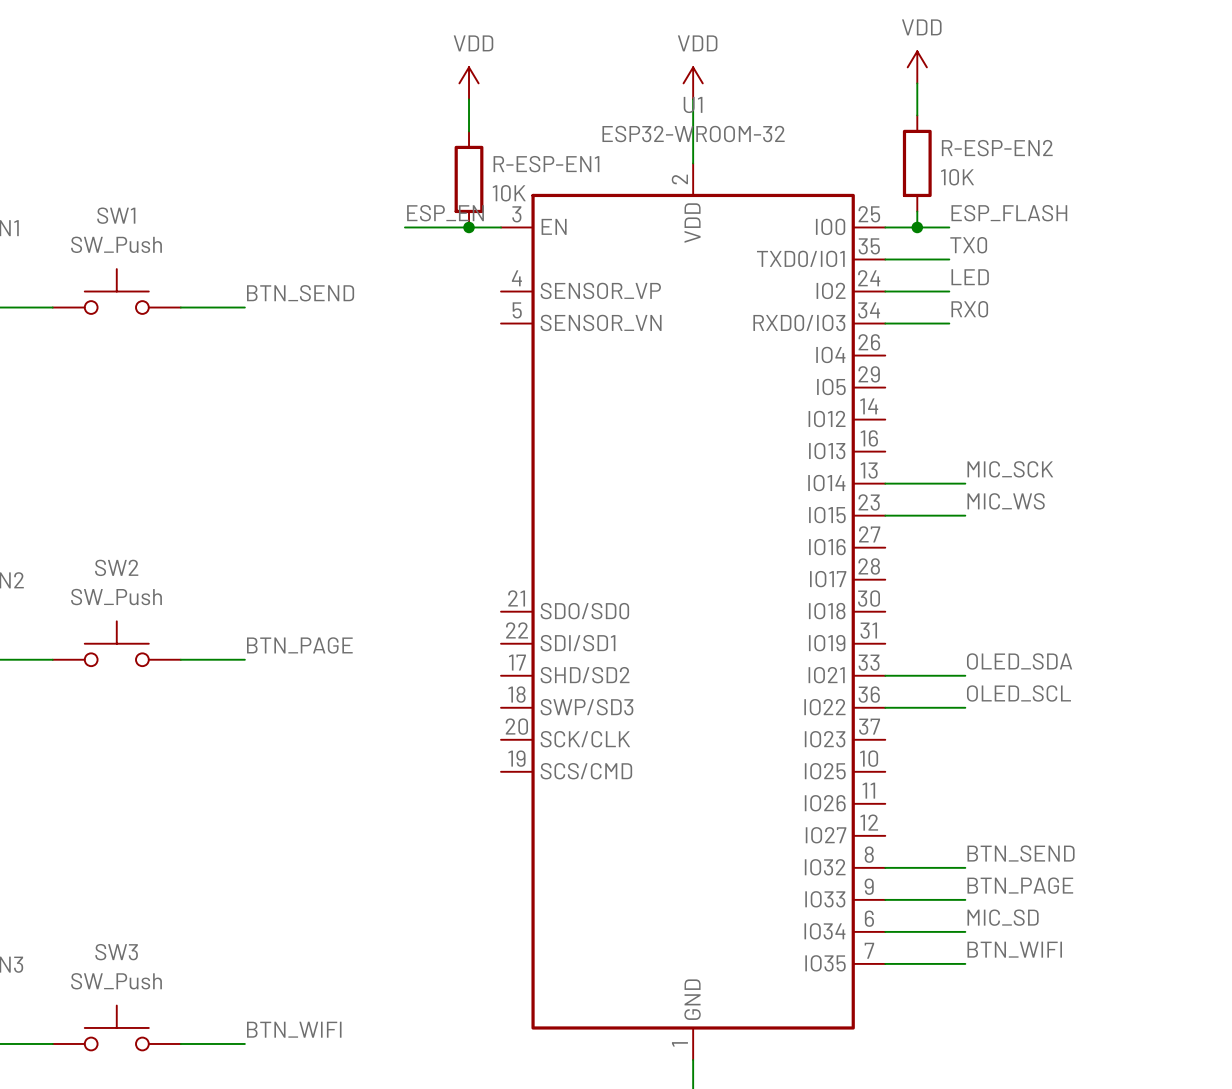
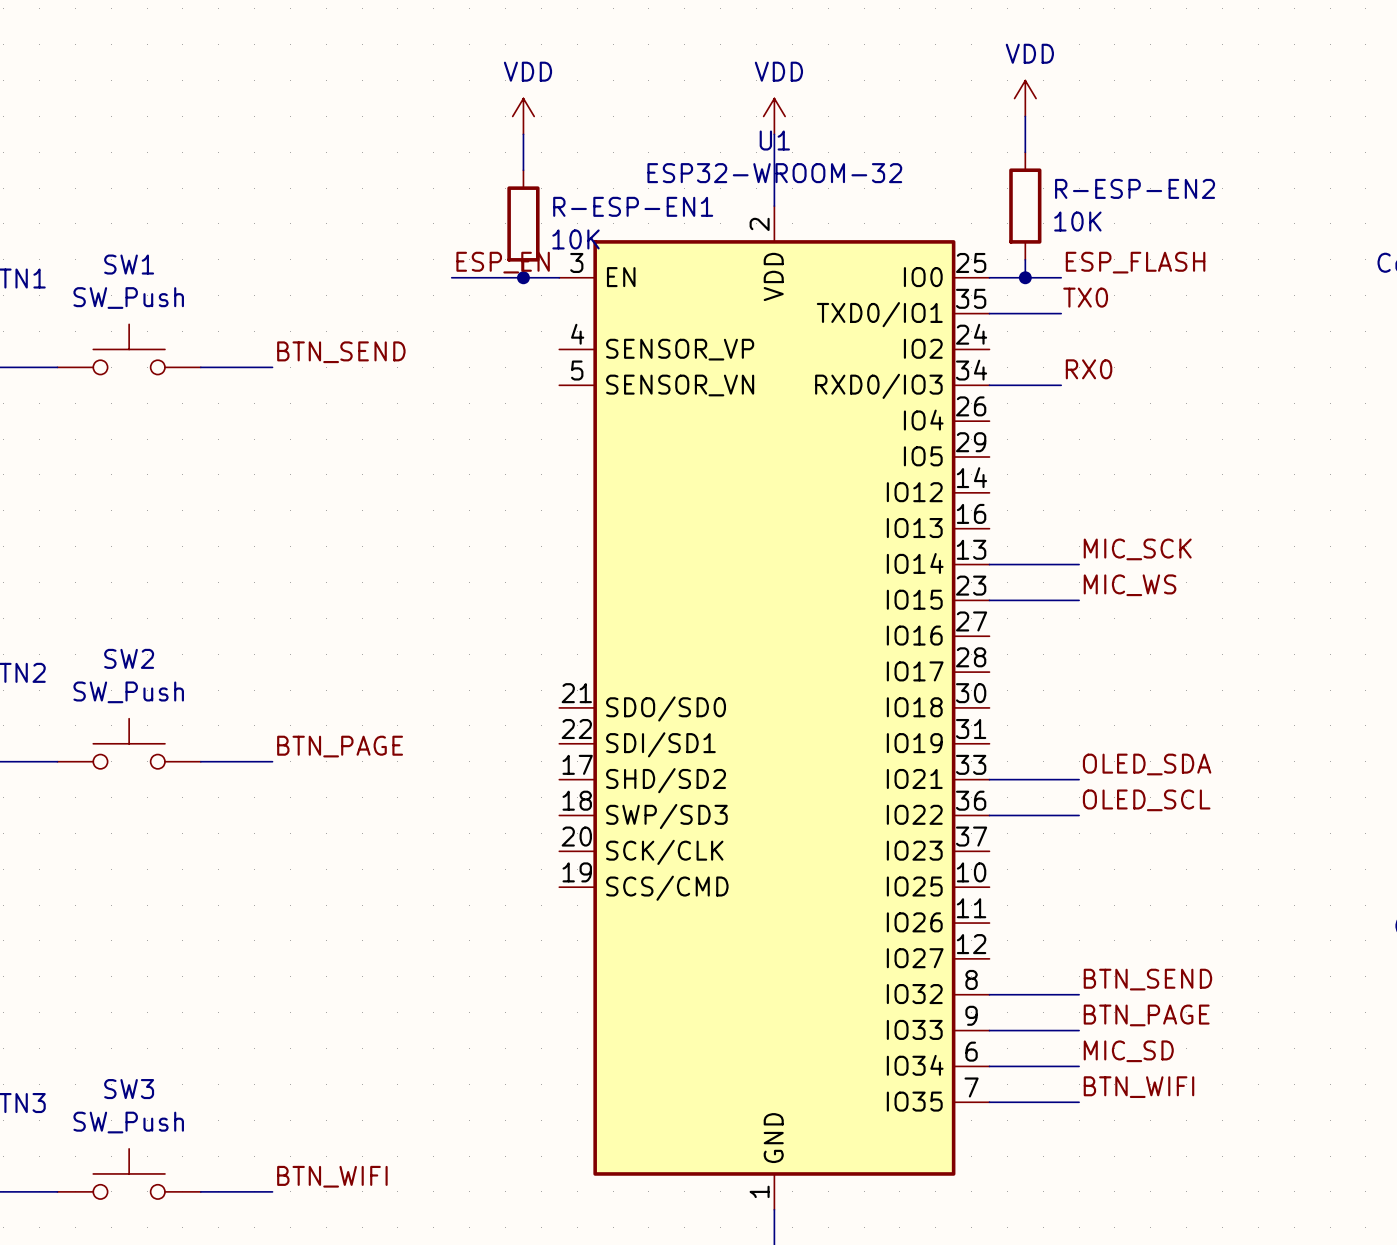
label: LED (970, 277) -> none
wire: (885, 291) (949, 291) -> none

